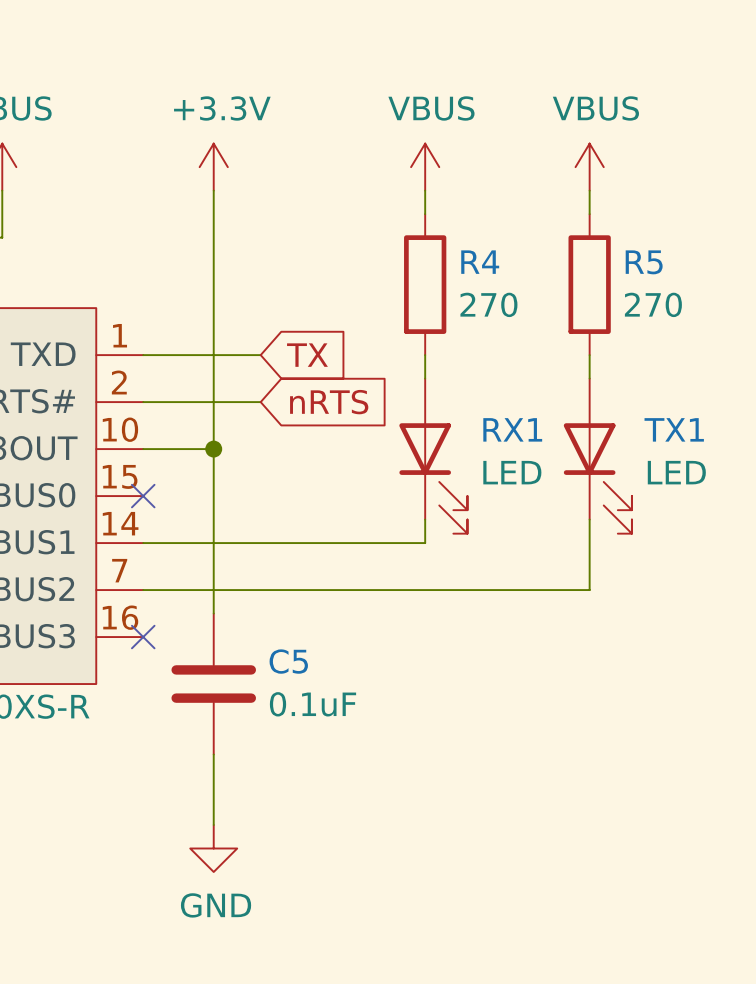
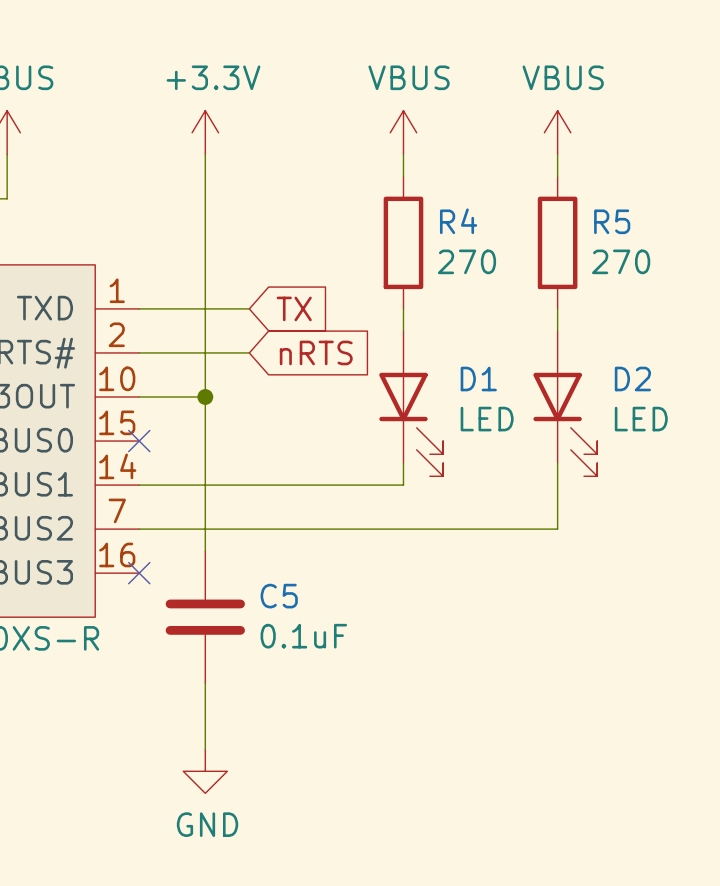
RX1 name: RX1 (512, 429) -> D1 (478, 379)
TX1 name: TX1 (674, 429) -> D2 (632, 379)

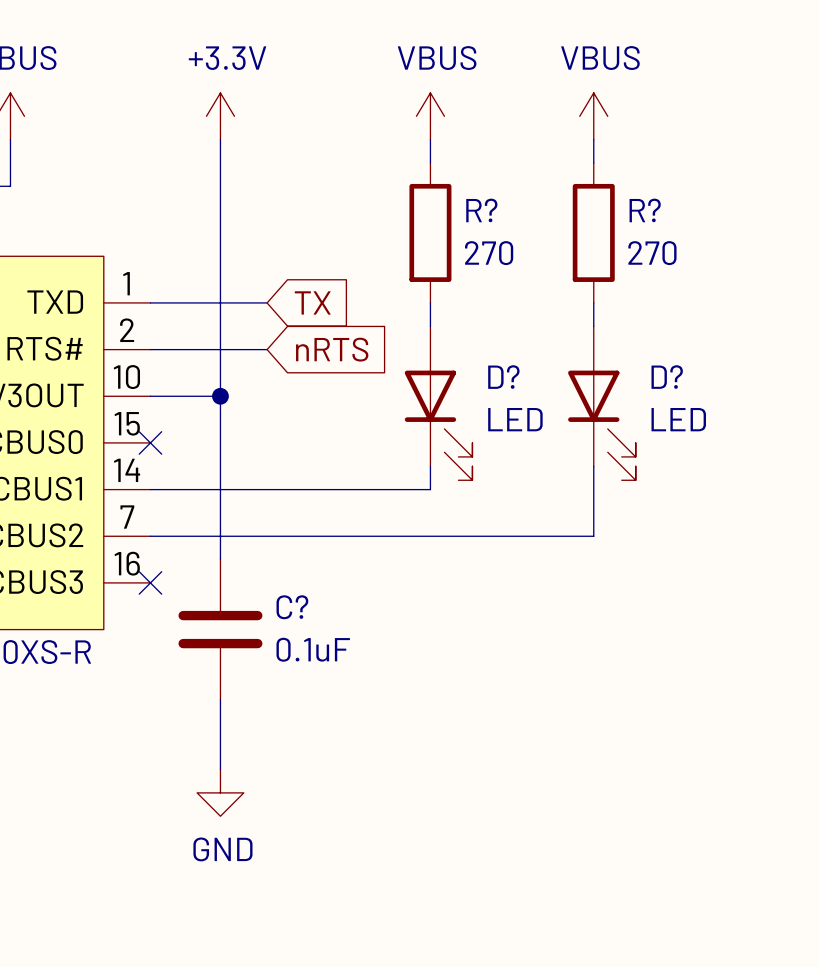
R4 name: R4 (458, 221) -> R? (481, 210)
R5 name: R5 (612, 221) -> R? (645, 210)
D1 name: D1 (478, 379) -> D? (503, 377)
D2 name: D2 (632, 379) -> D? (667, 377)
C5 name: C5 (279, 596) -> C? (292, 607)

